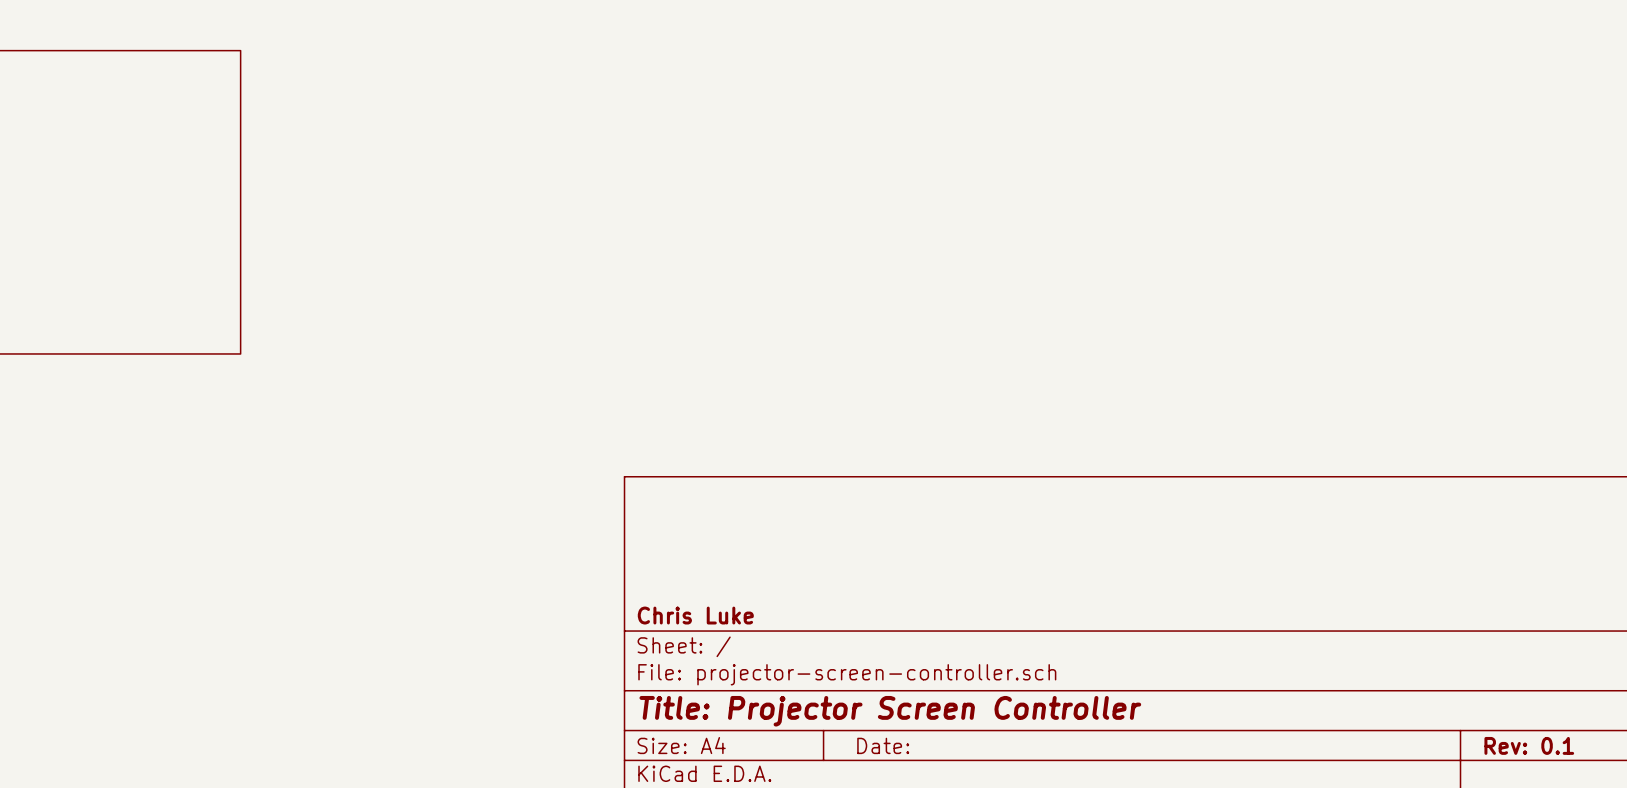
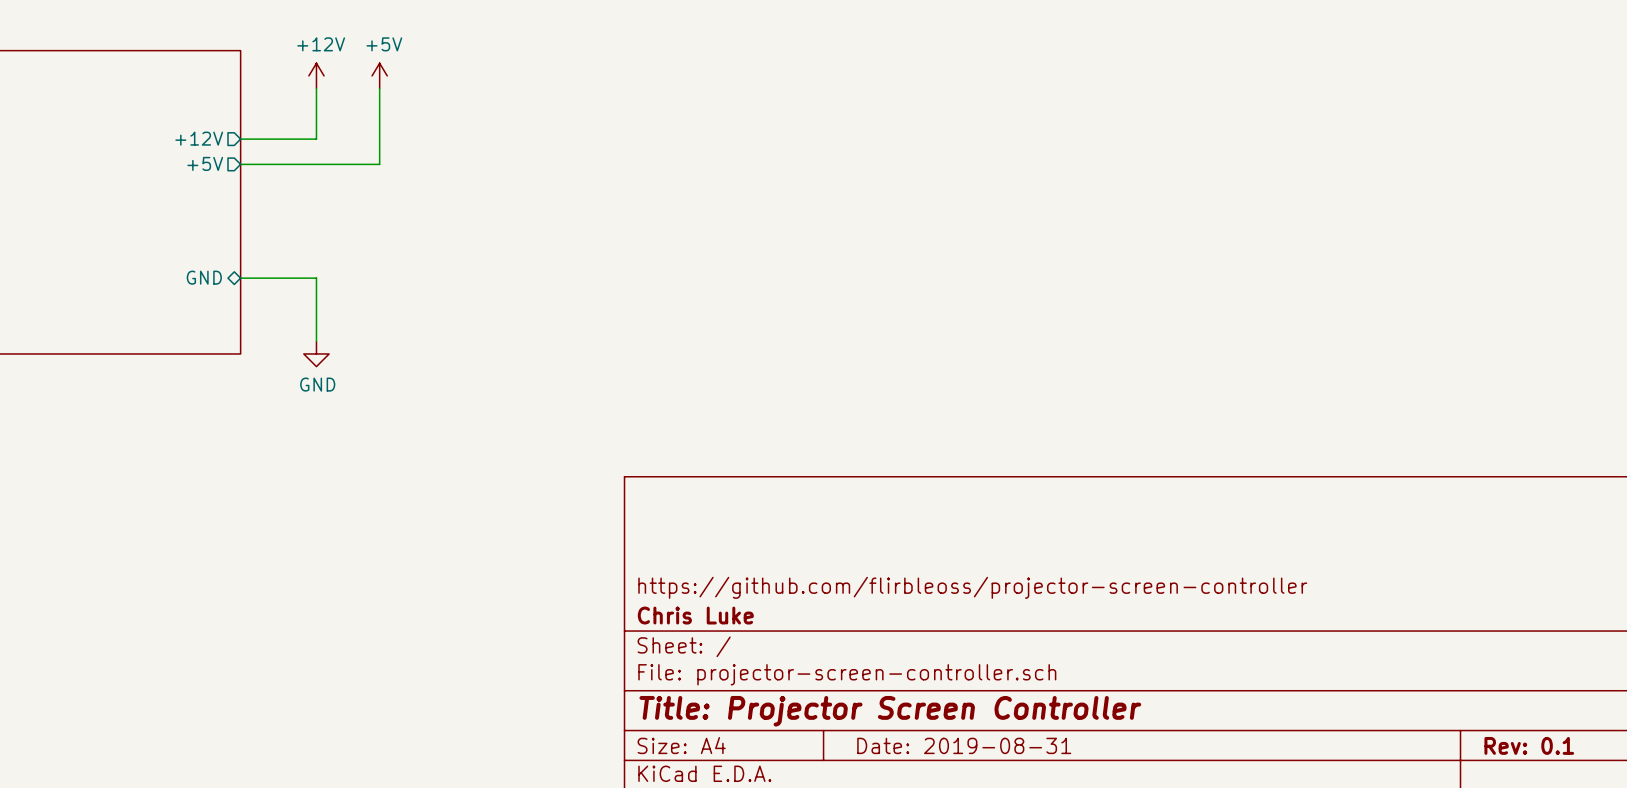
power symbol: none -> +12V (316, 75)
power symbol: none -> +5V (379, 75)
wire: none -> (316, 88) (316, 139) (240, 139)
wire: none -> (379, 88) (379, 164) (240, 164)
sheet pin: none -> +12V (199, 138)
sheet pin: none -> +5V (205, 163)
sheet pin: none -> GND (204, 277)
wire: none -> (240, 278) (316, 278) (316, 341)
power symbol: none -> GND (316, 353)
title block: none -> https://github.com/flirbleoss/projector-screen-controller (972, 587)
title block: Date: (883, 745) -> Date: 2019-08-31 (964, 745)

